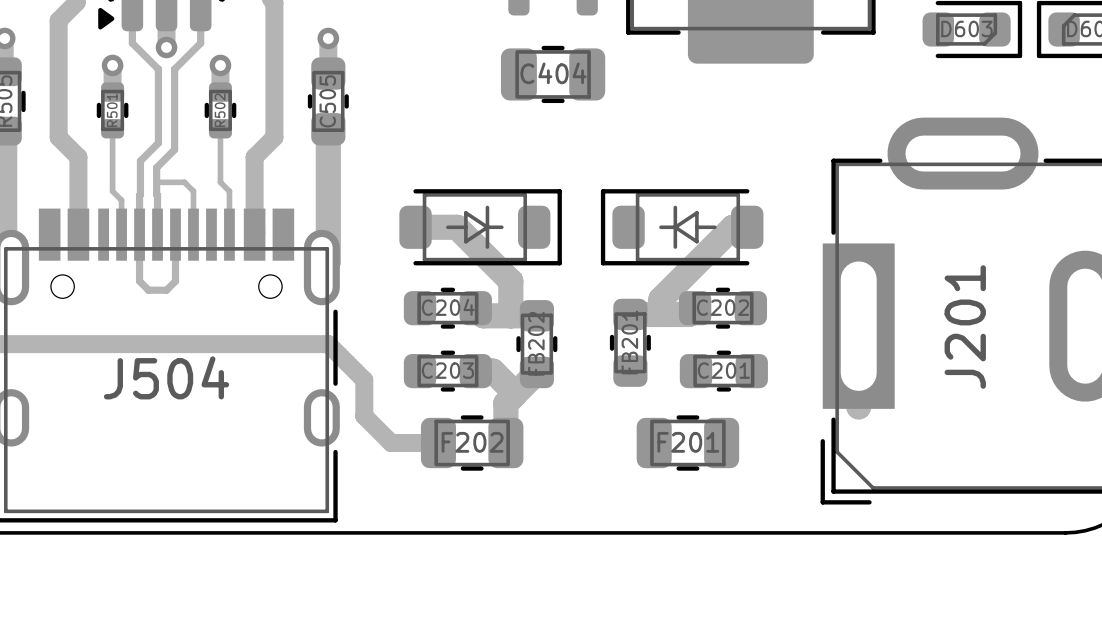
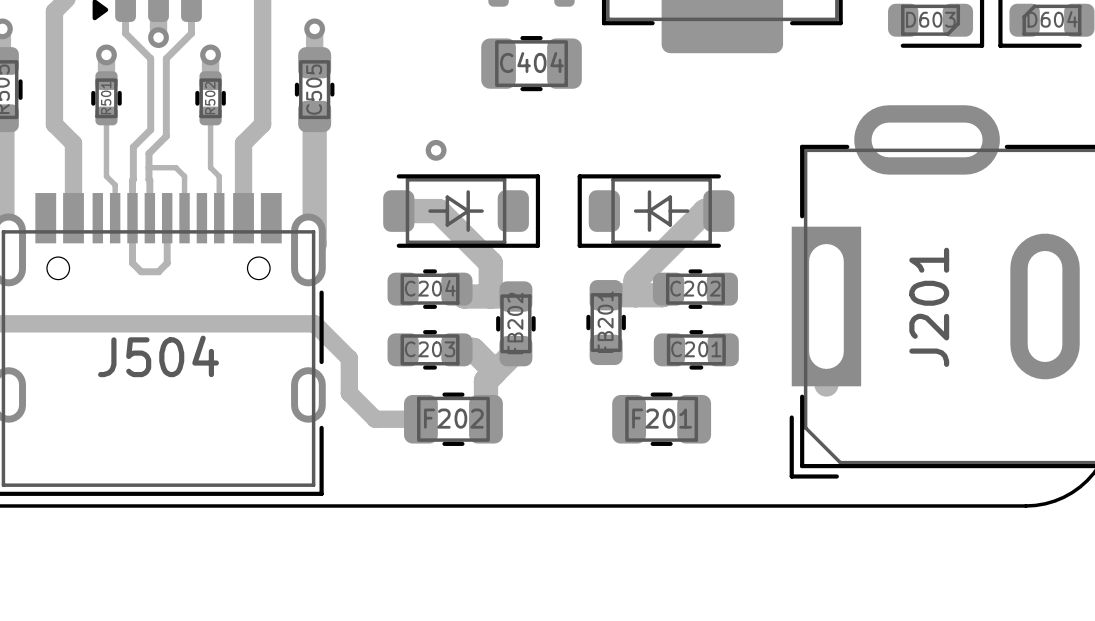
via: none -> (436, 150)

